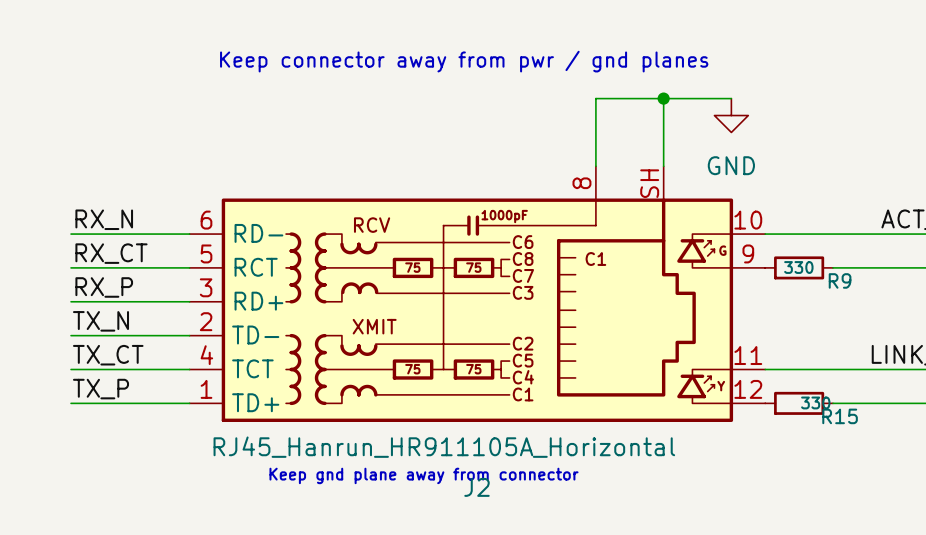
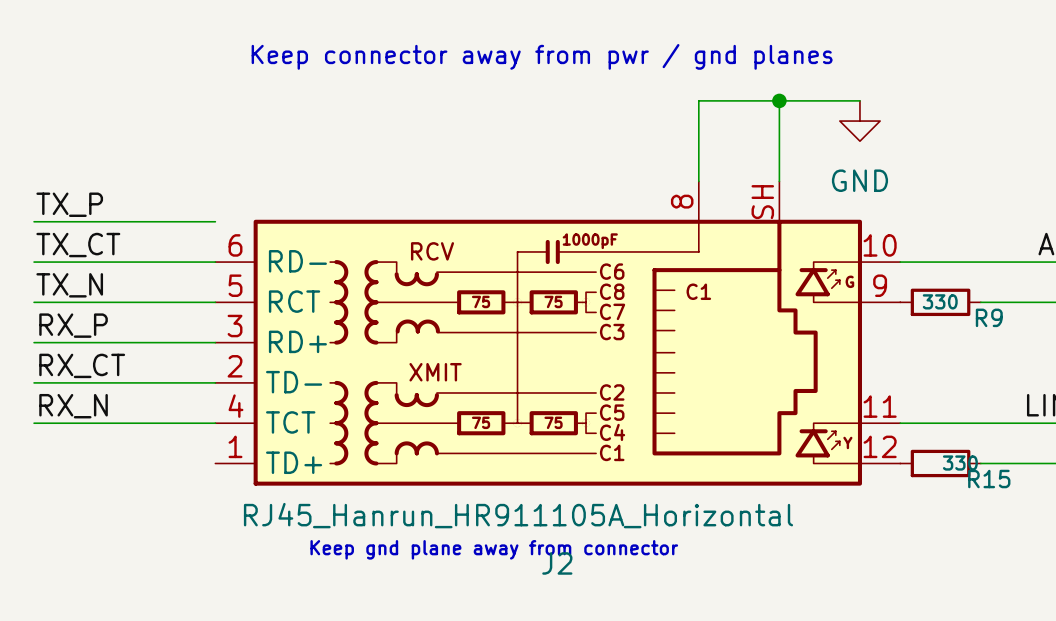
wire: none -> (34, 221) (215, 221)
label position: RX_N (104, 219) -> RX_N (73, 406)
wire: none -> (34, 262) (74, 262)
label position: RX_CT (111, 253) -> RX_CT (82, 365)
wire: none -> (34, 302) (74, 302)
label position: RX_P (104, 287) -> RX_P (73, 325)
wire: none -> (34, 342) (74, 342)
label position: TX_N (101, 321) -> TX_N (69, 285)
wire: none -> (34, 382) (74, 382)
label position: TX_CT (108, 355) -> TX_CT (78, 245)
wire: none -> (34, 423) (74, 423)
label position: TX_P (101, 389) -> TX_P (69, 204)
wire: (71, 403) (189, 403) -> none

